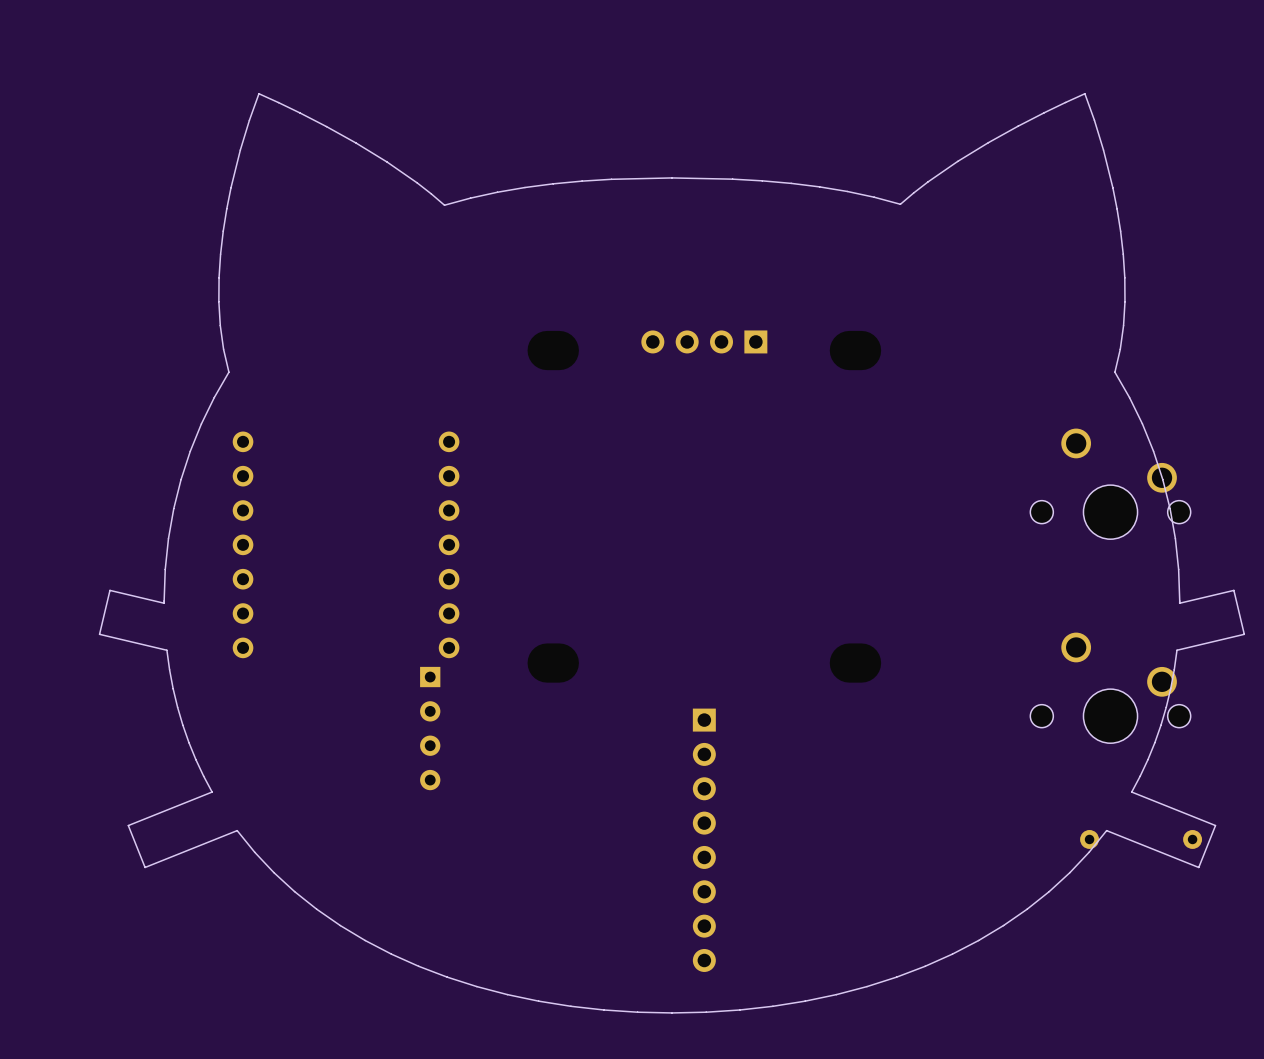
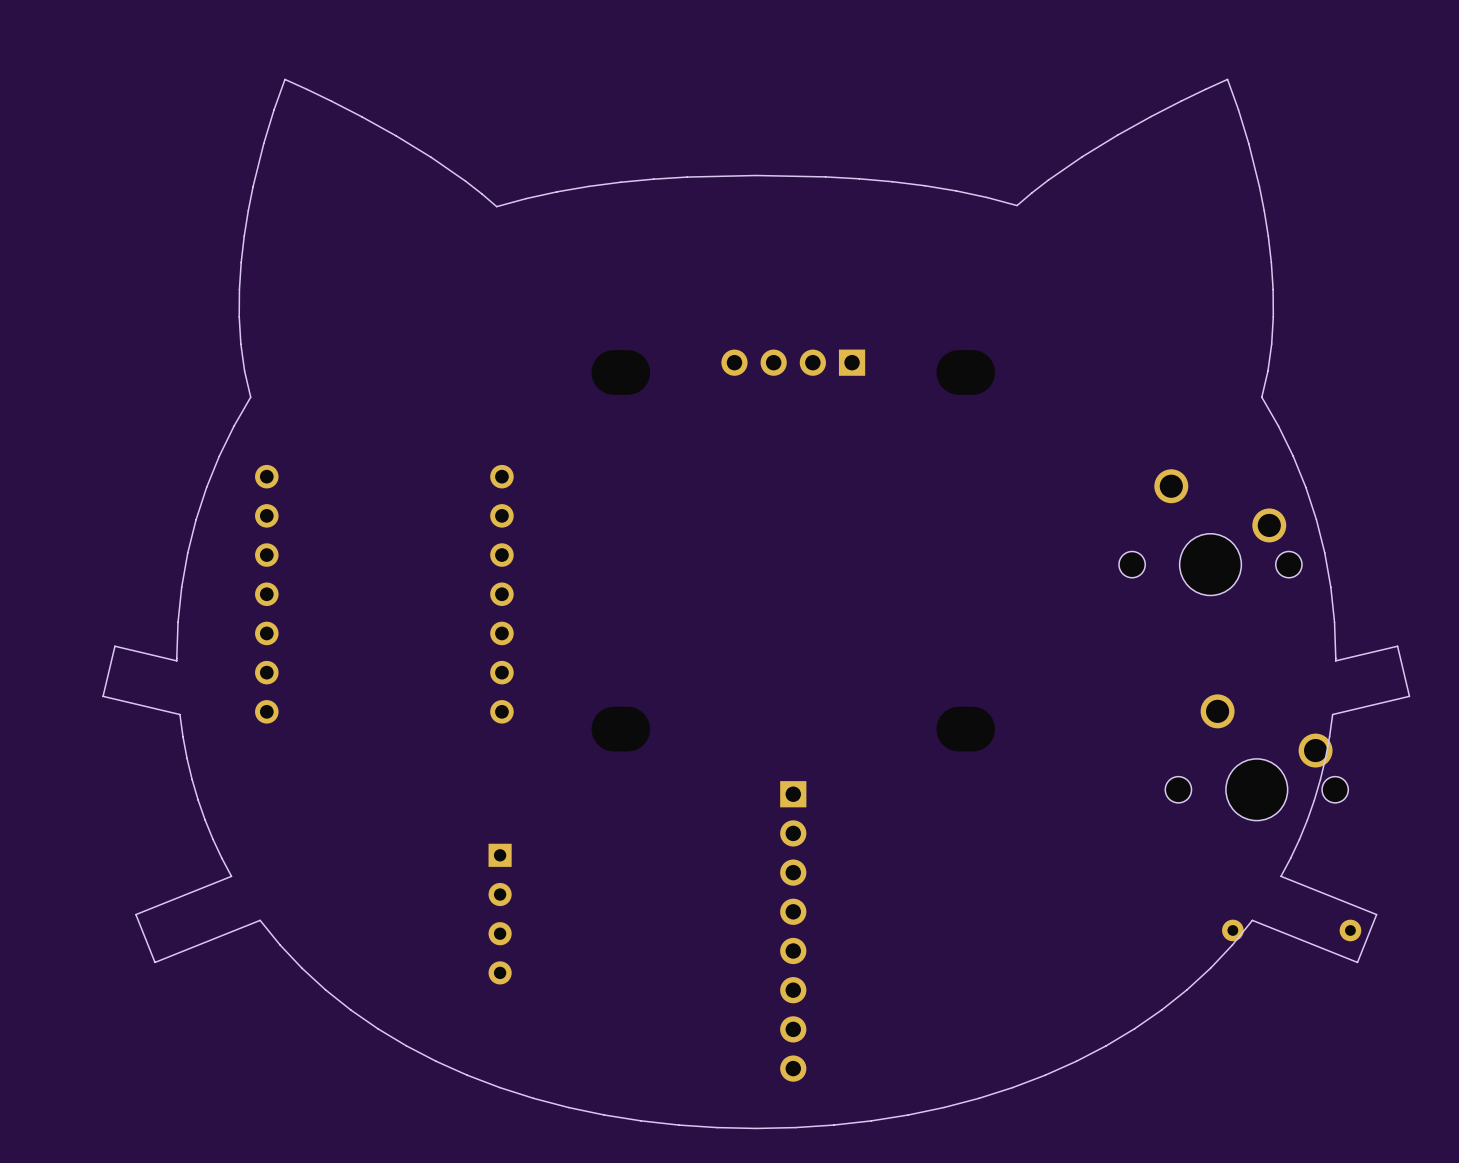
part position: (1110, 483) -> (1210, 532)
part position: (430, 728) -> (500, 914)

